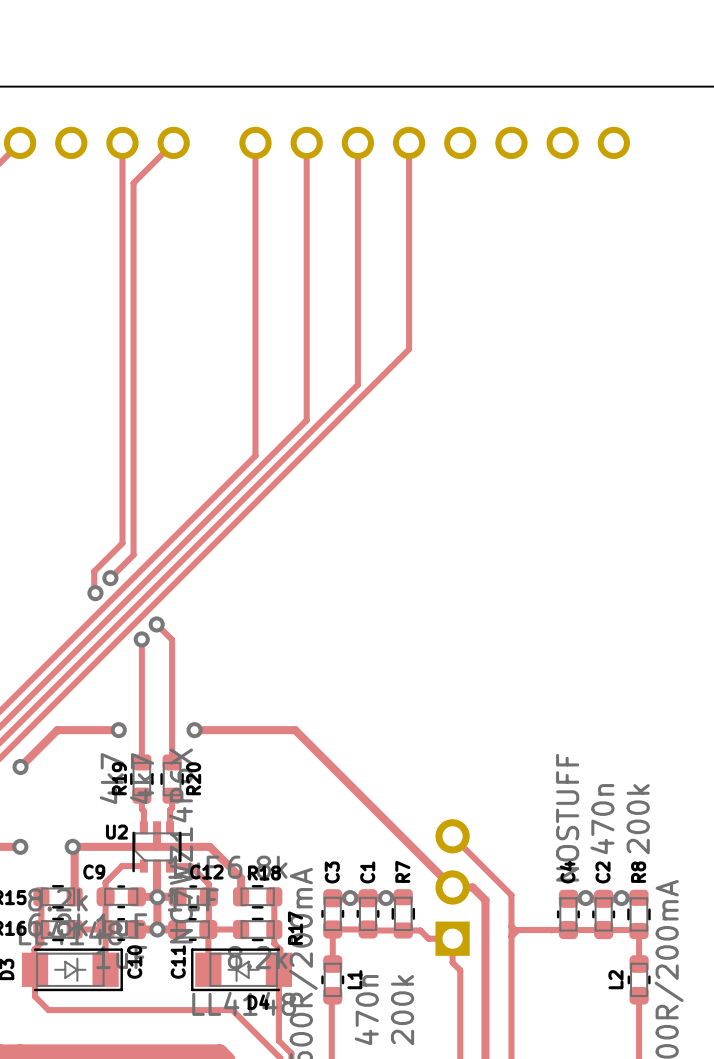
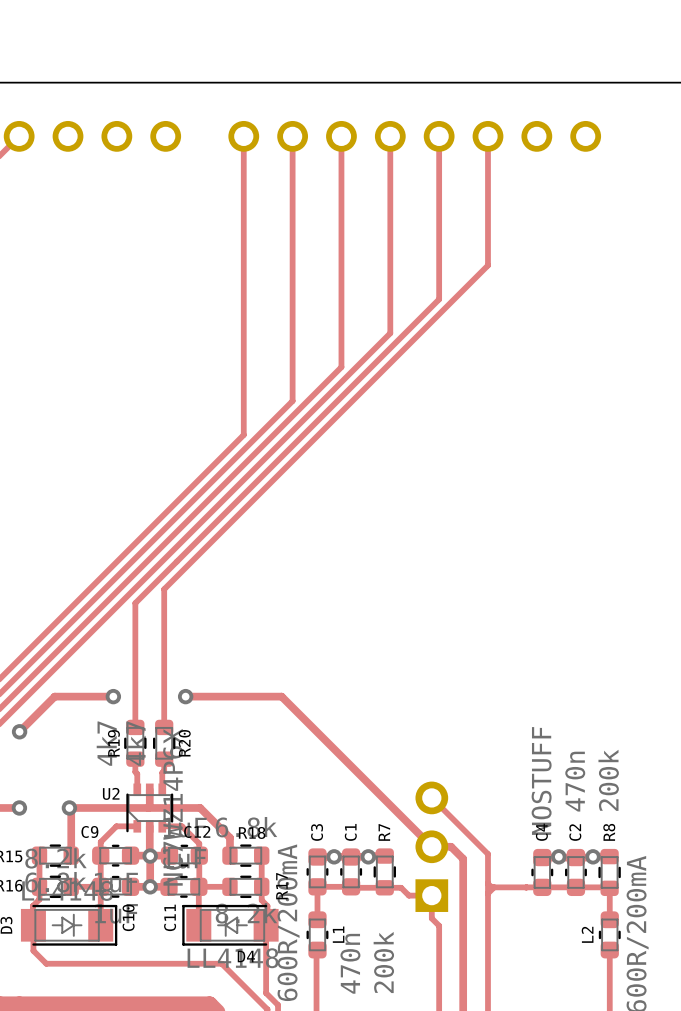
track: (122, 142) (122, 543) (94, 571) (95, 593) -> none
track: (173, 142) (133, 183) (133, 555) (110, 578) -> none
track: none -> (439, 136) (439, 299) (135, 603) (135, 610)
via: (110, 578) -> none
via: (95, 593) -> none
track: (156, 624) (172, 639) -> (487, 136) (487, 265) (164, 589) (164, 610)
via: (156, 624) -> none
via: (141, 639) -> none

